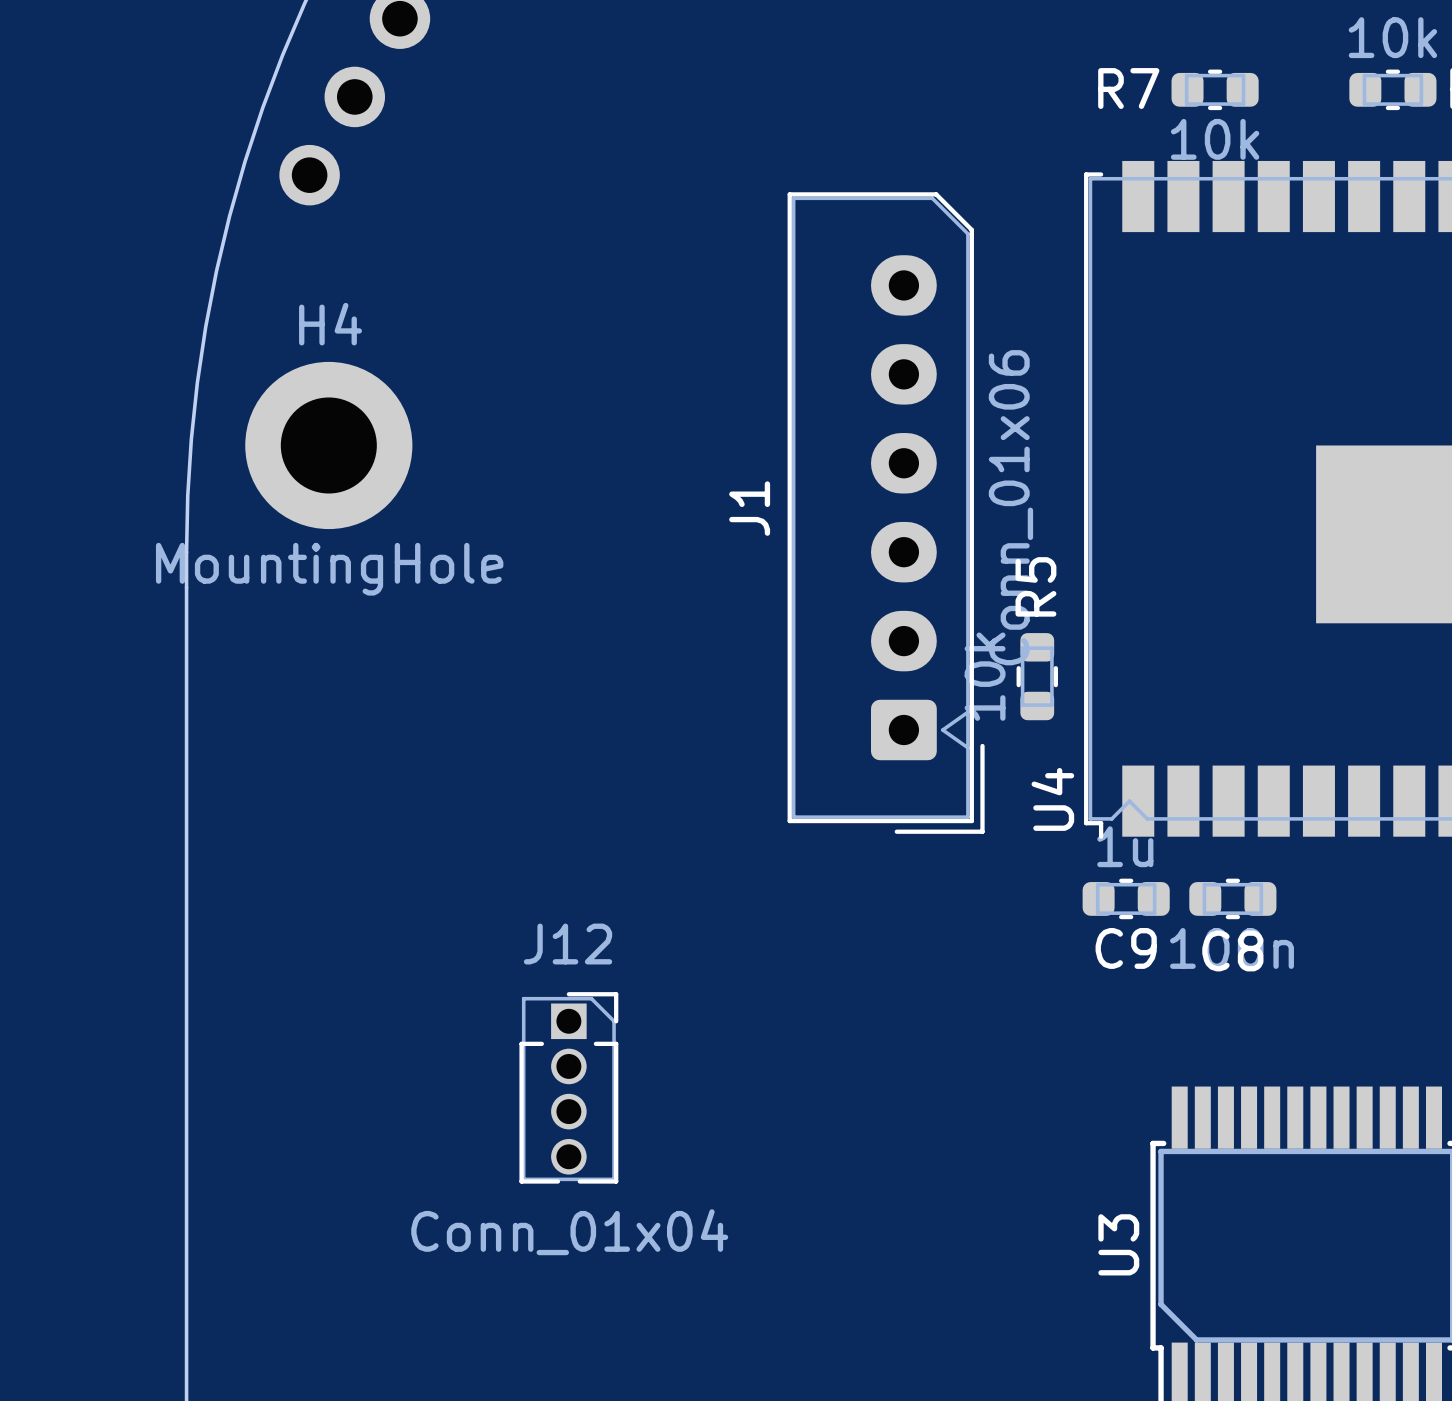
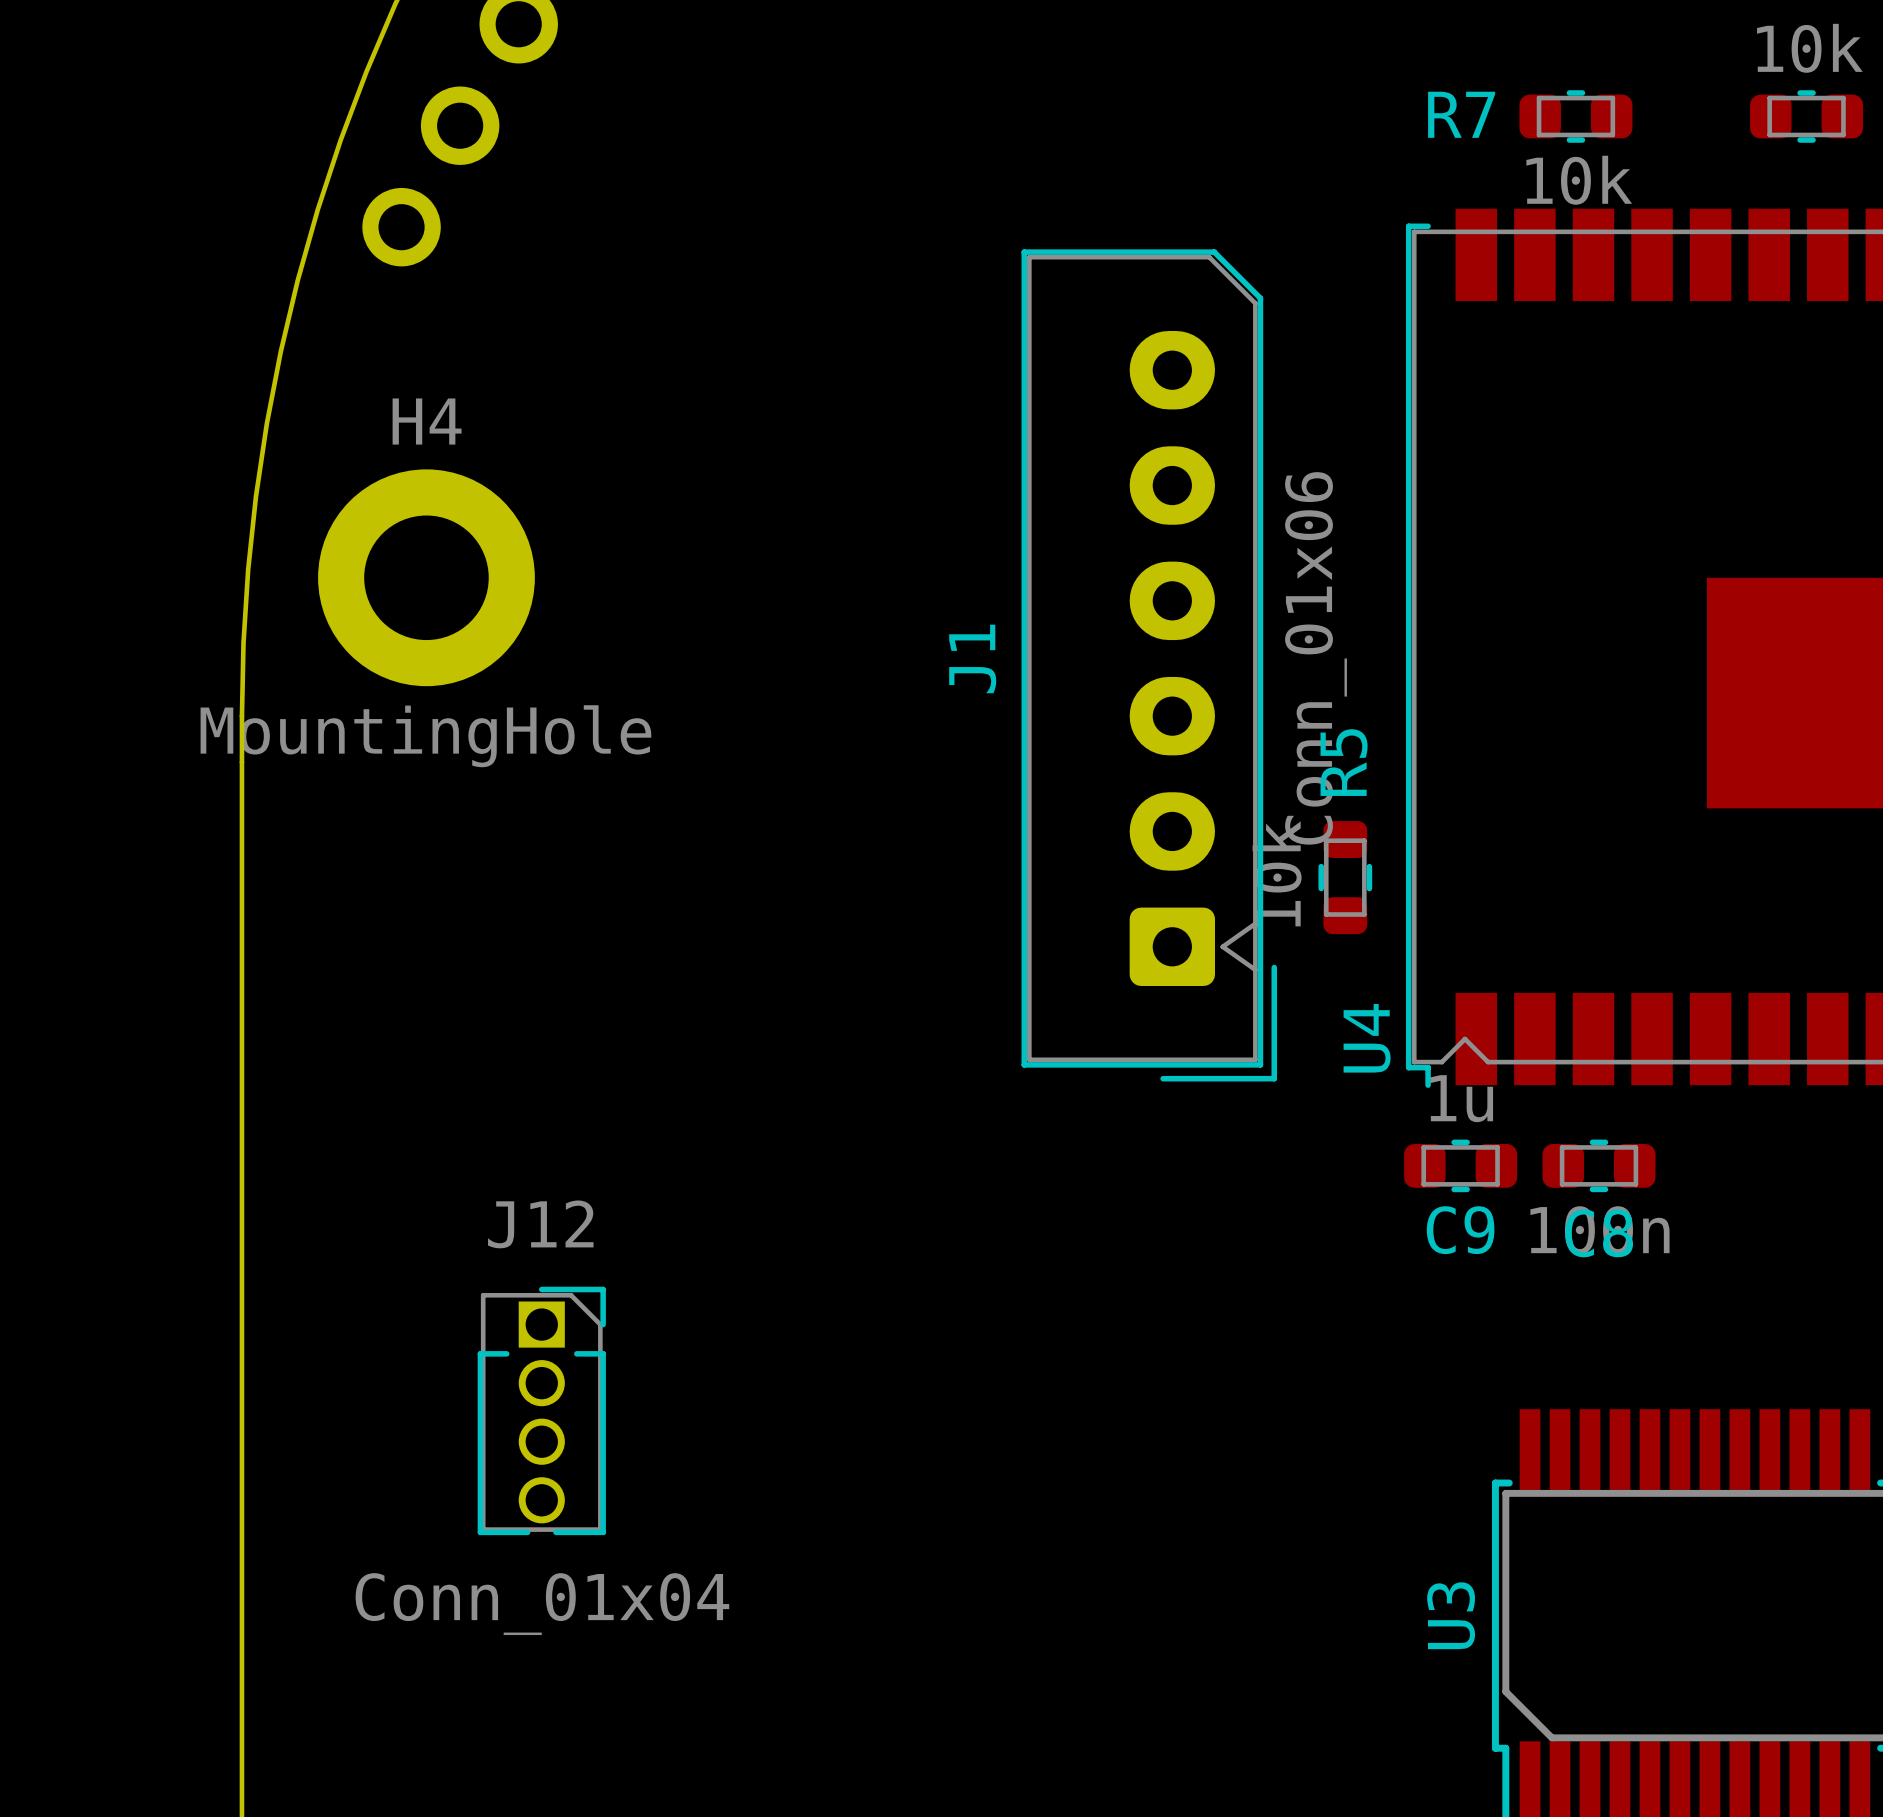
J12 position: (568, 1087) -> (541, 1410)

